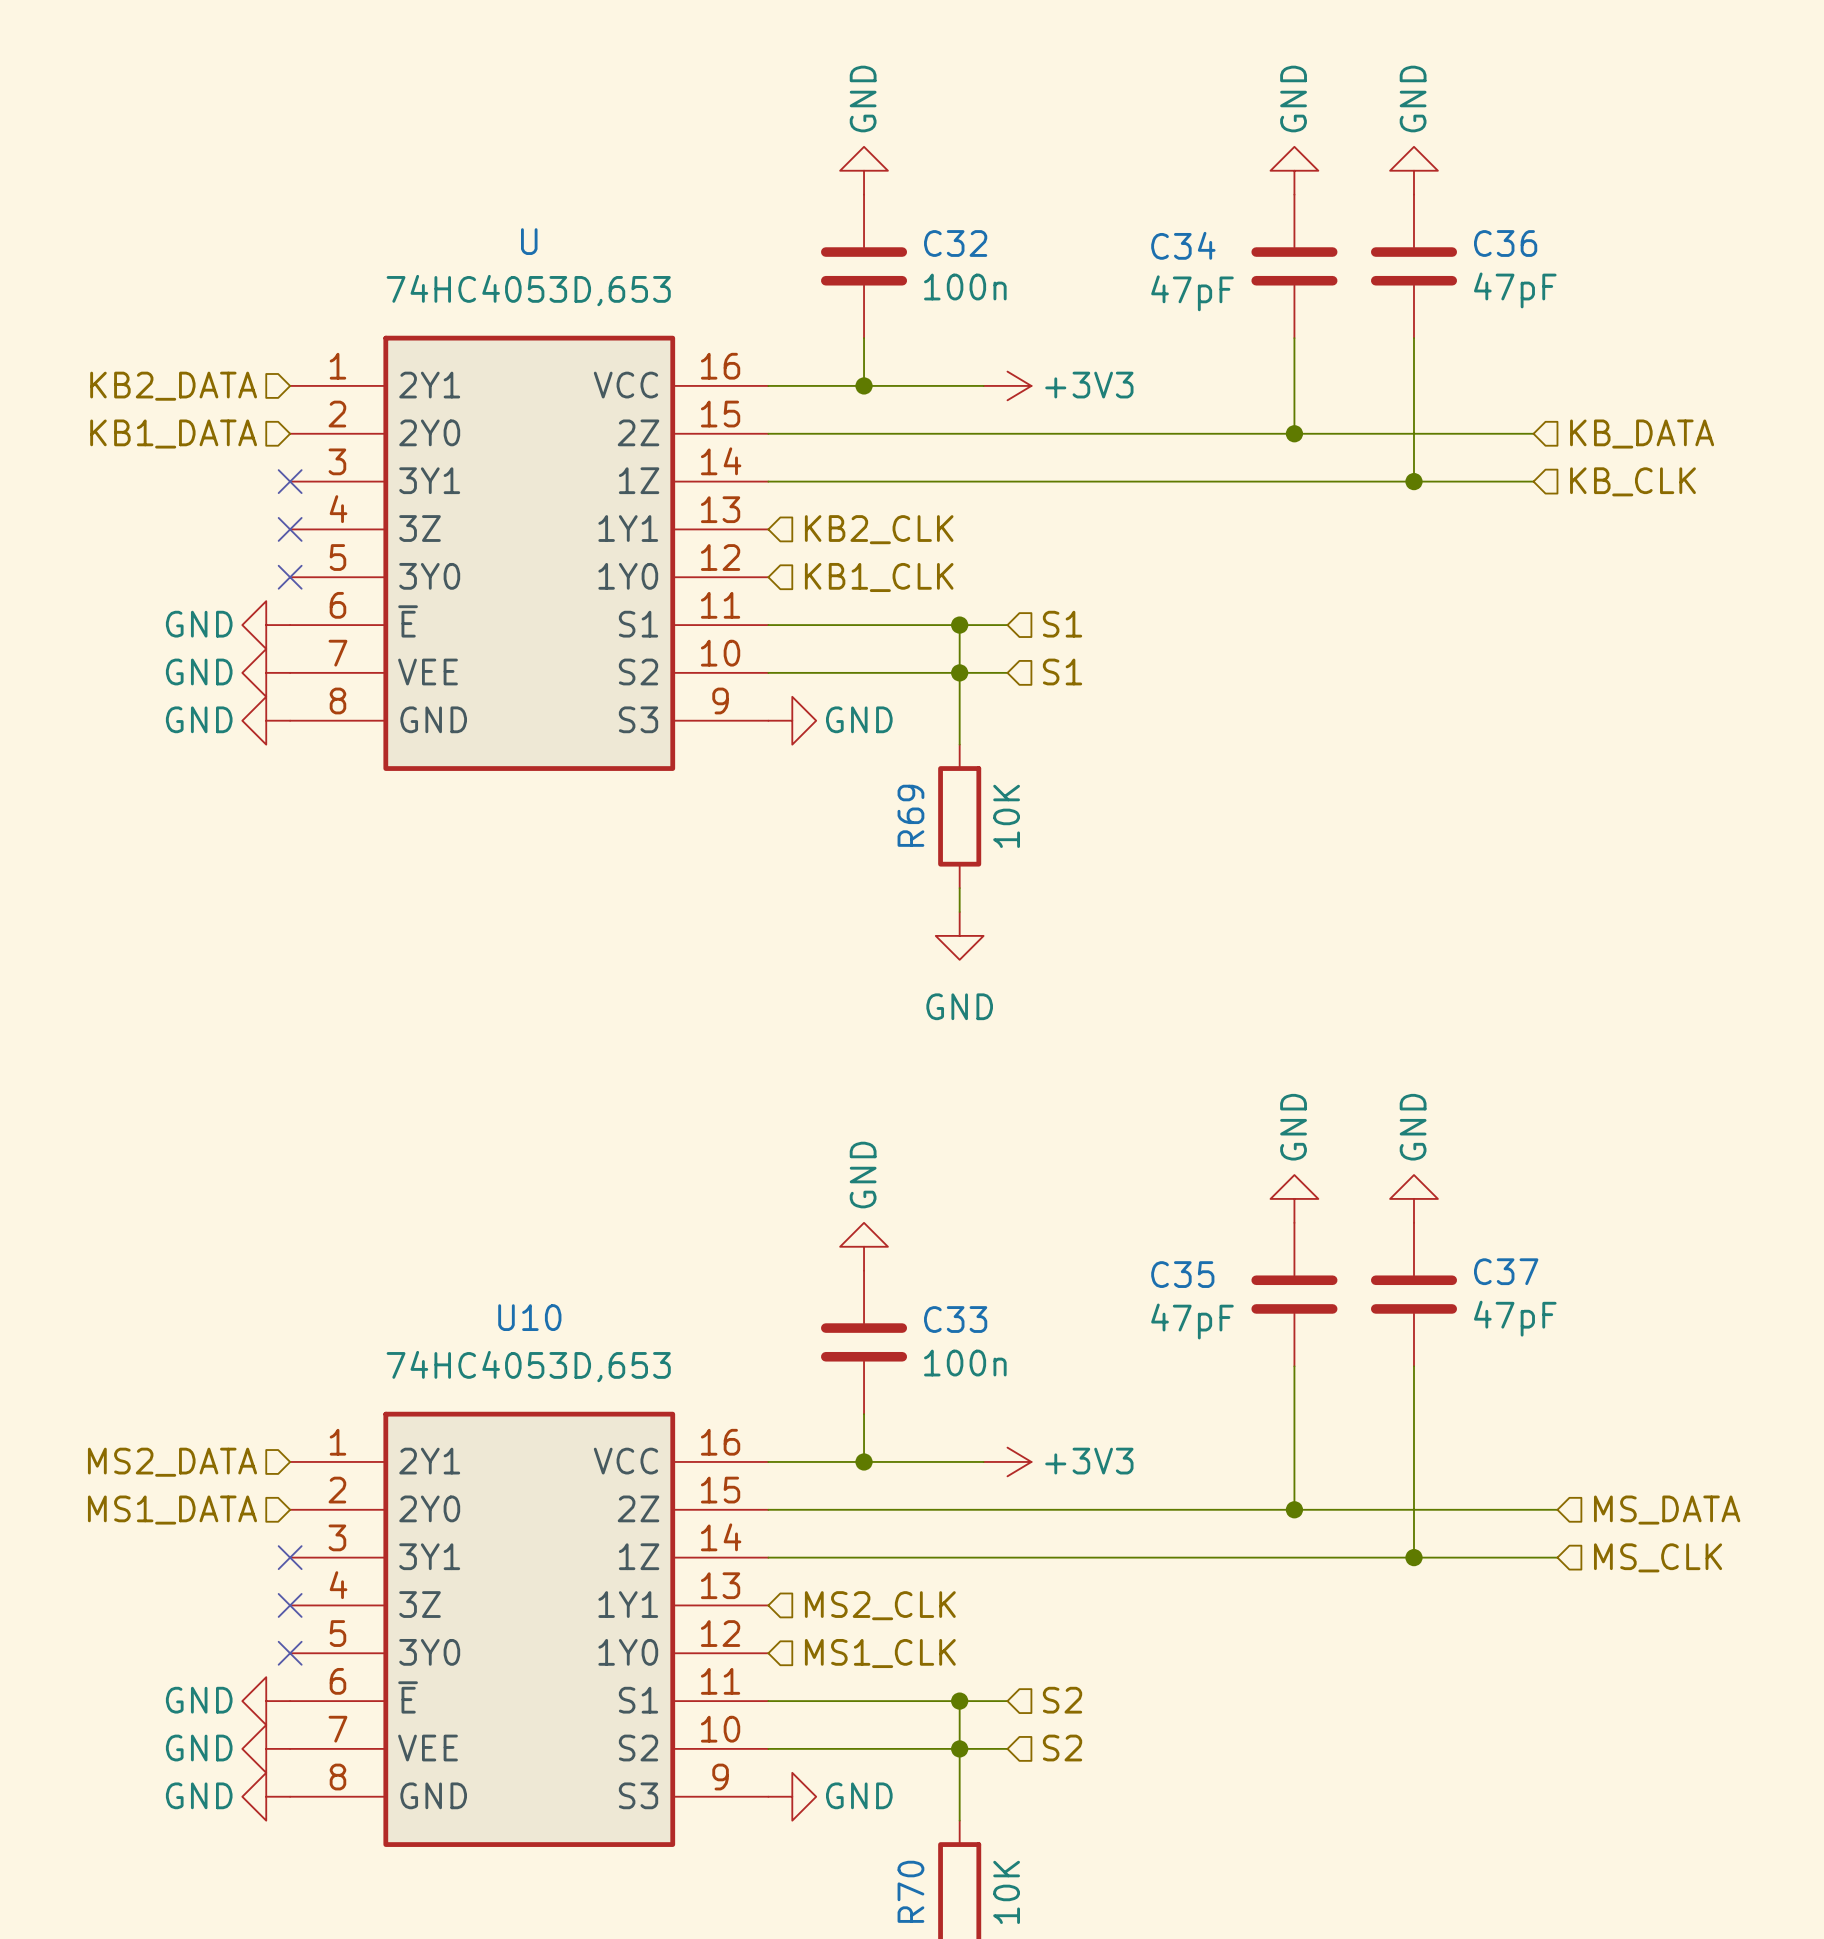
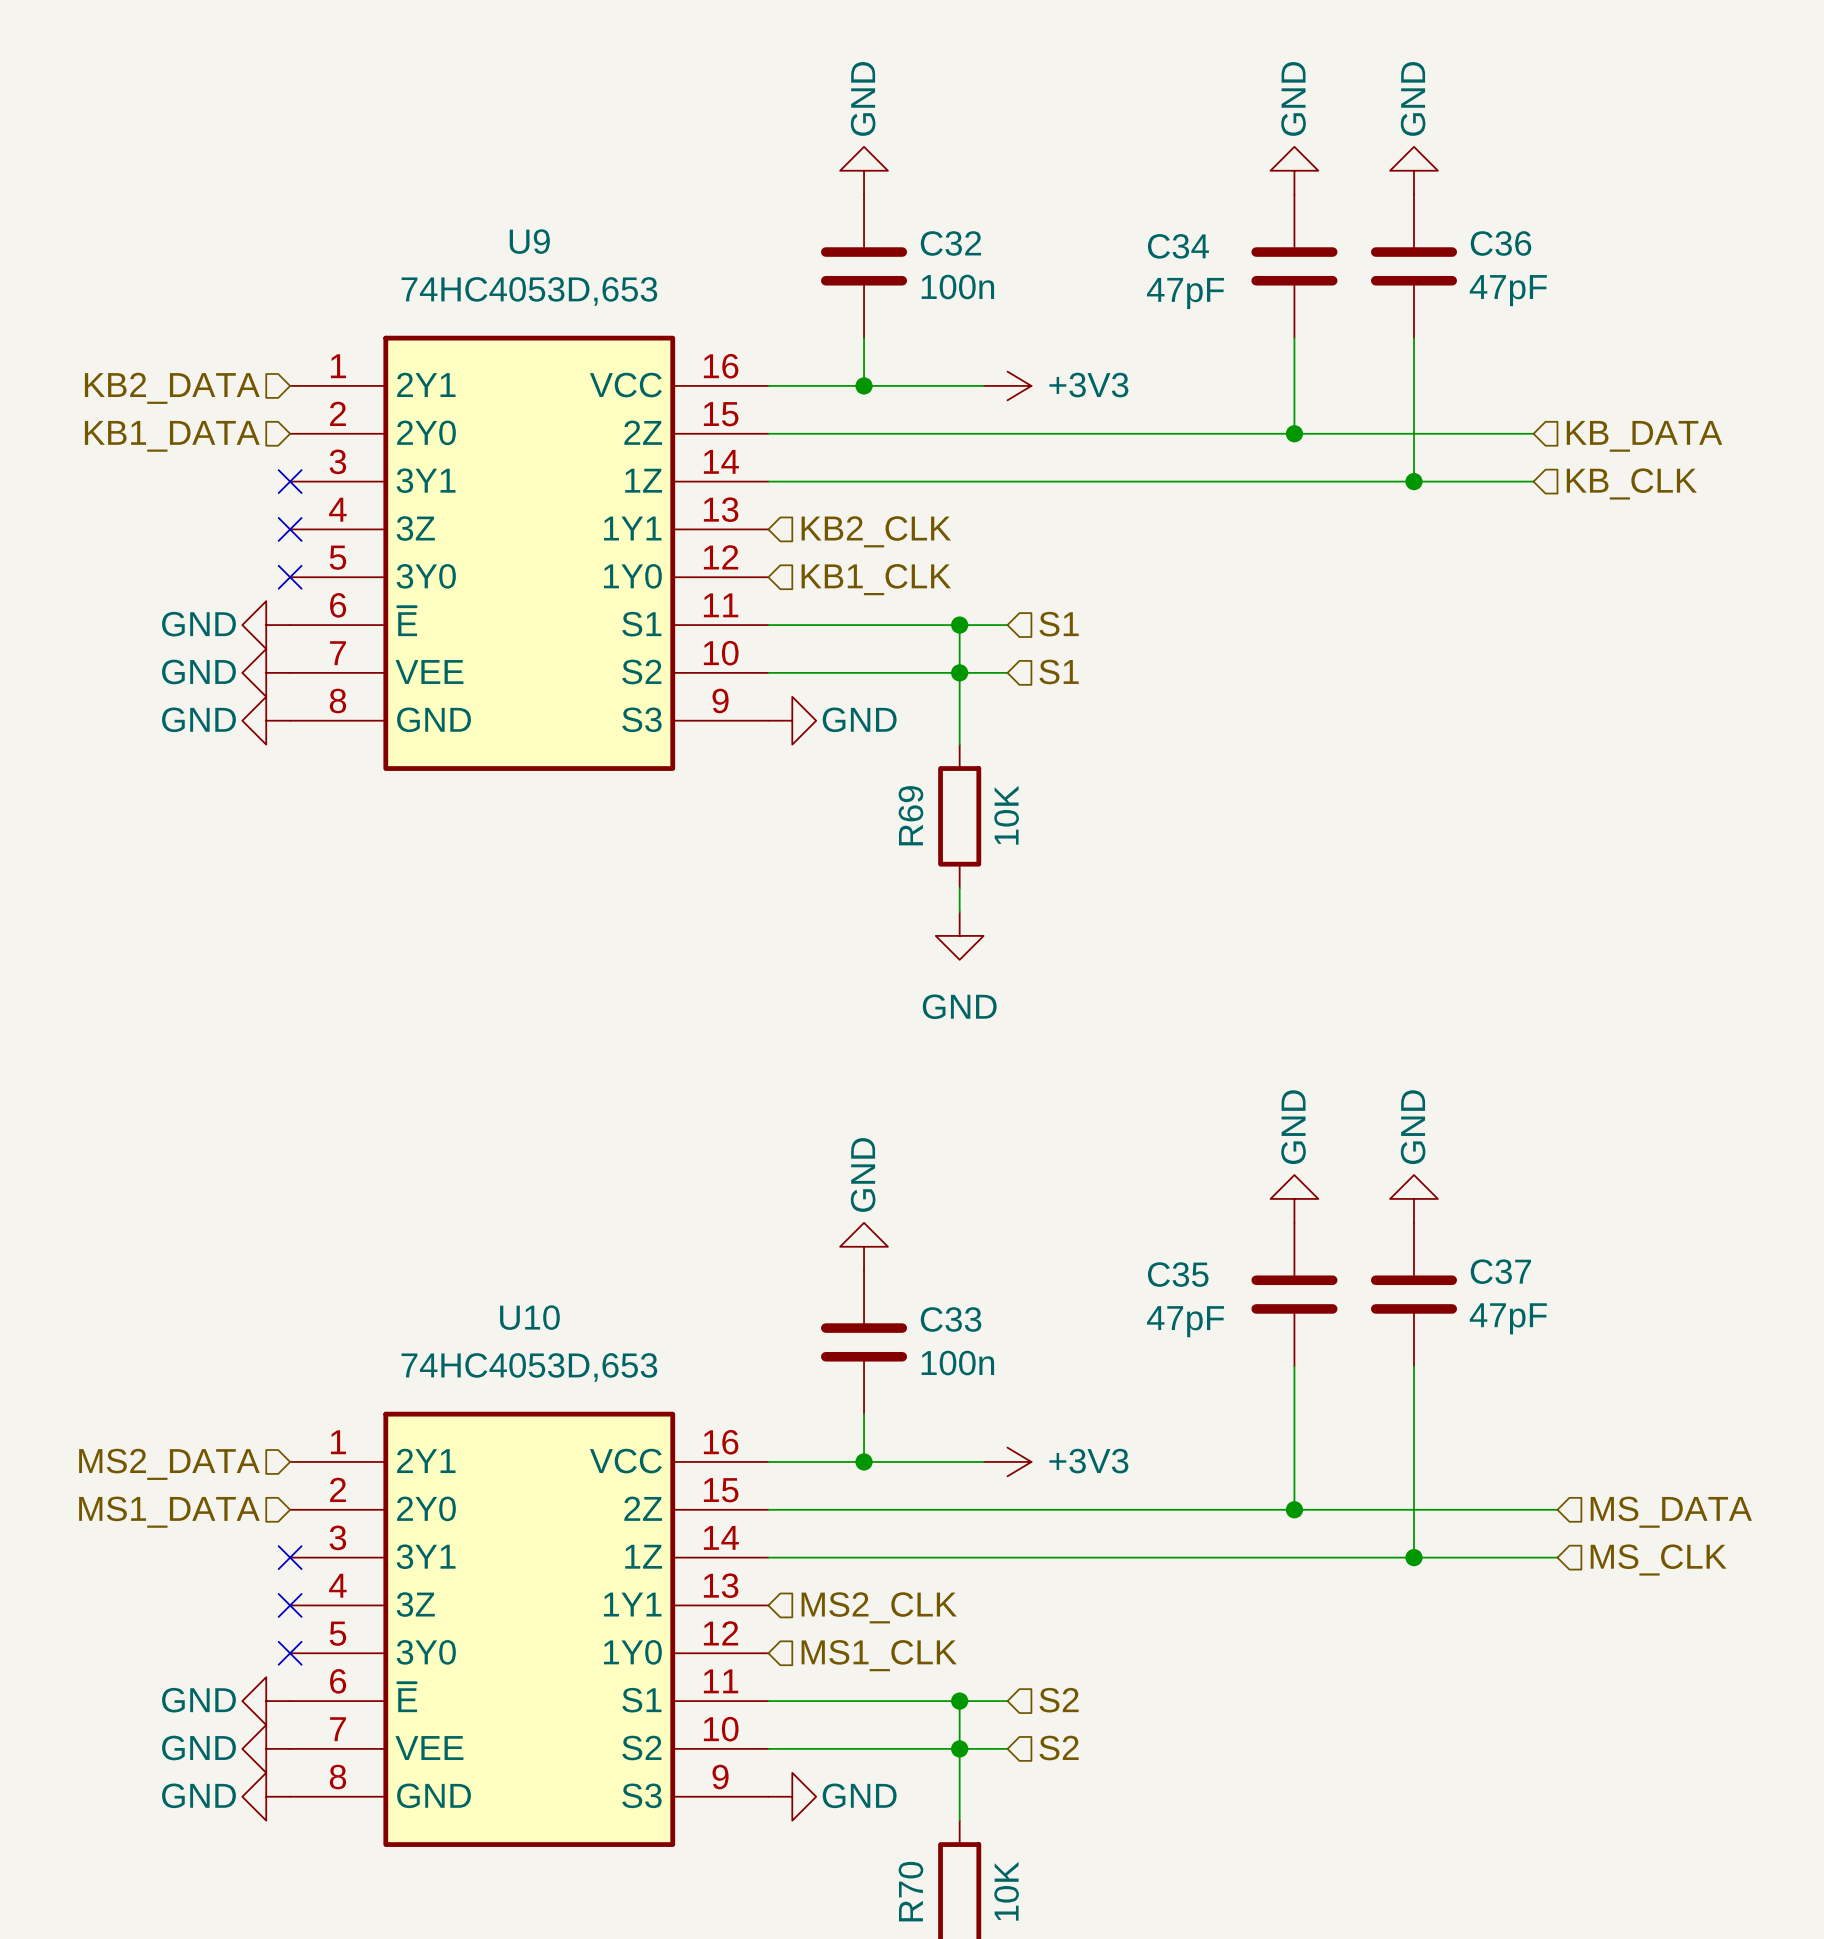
U name: U (529, 241) -> U9 (529, 241)

